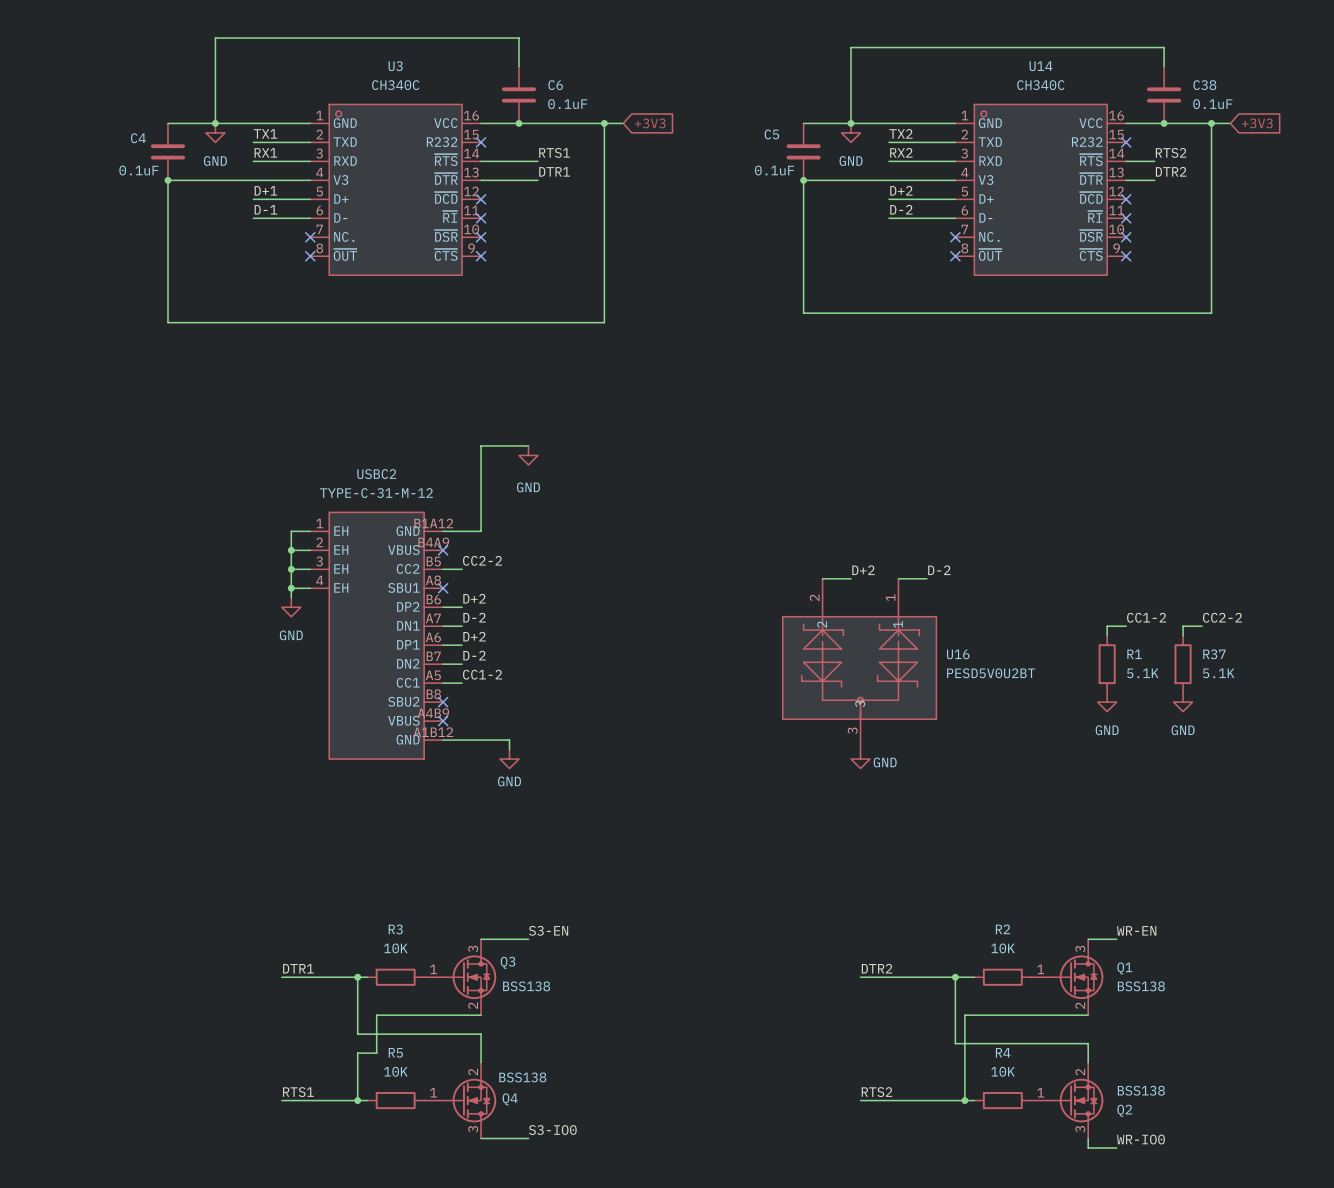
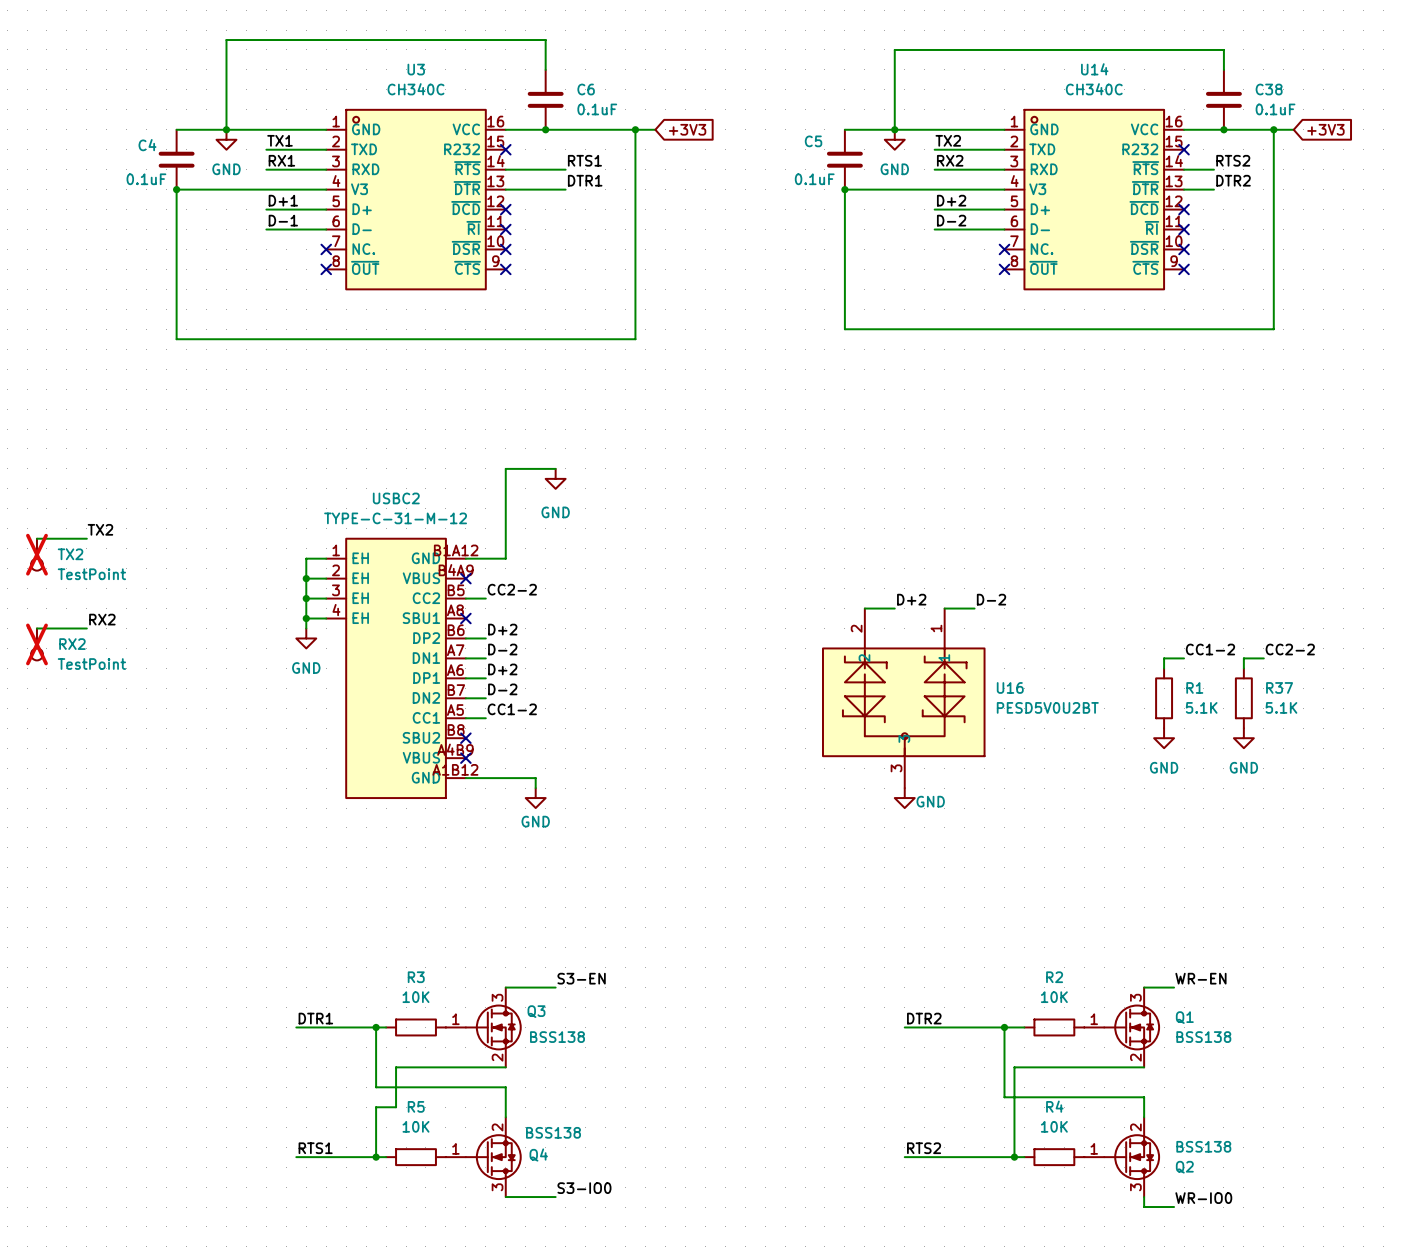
label: none -> TX2 (100, 529)
wire: none -> (36, 538) (86, 538)
TX2: none -> TestPoint (36, 554)
label: none -> RX2 (102, 619)
wire: none -> (36, 628) (86, 628)
RX2: none -> TestPoint (36, 644)

